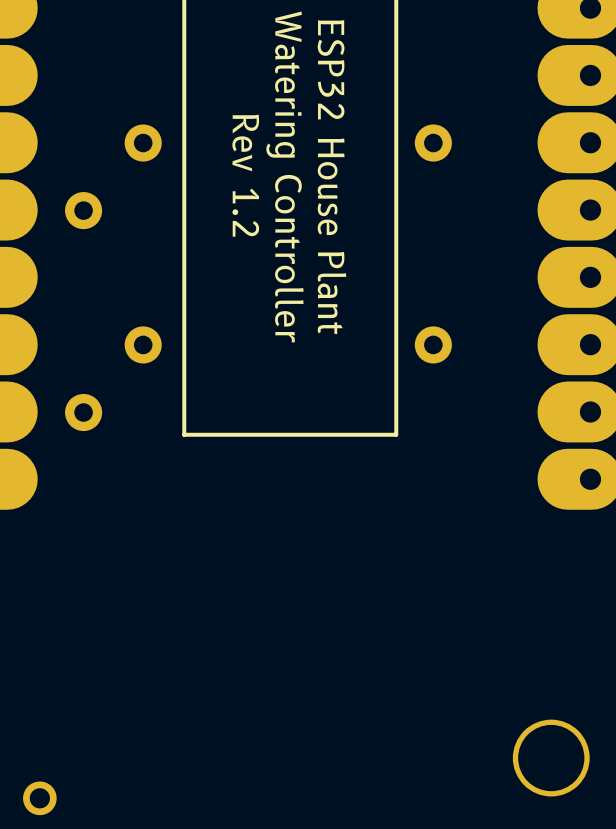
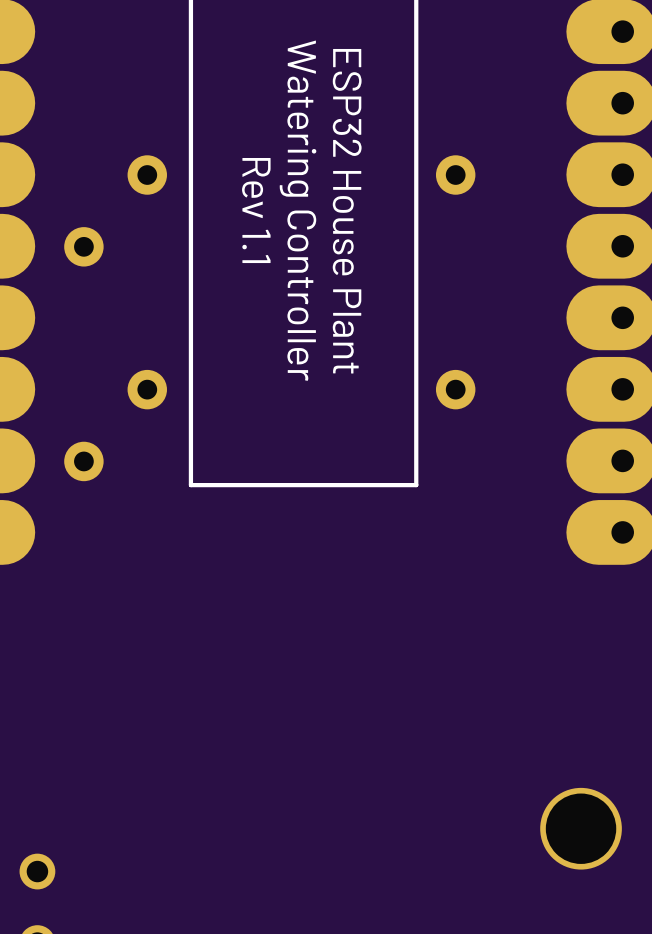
text: Rev 1.2 (245, 175) -> Rev 1.1 (256, 210)

